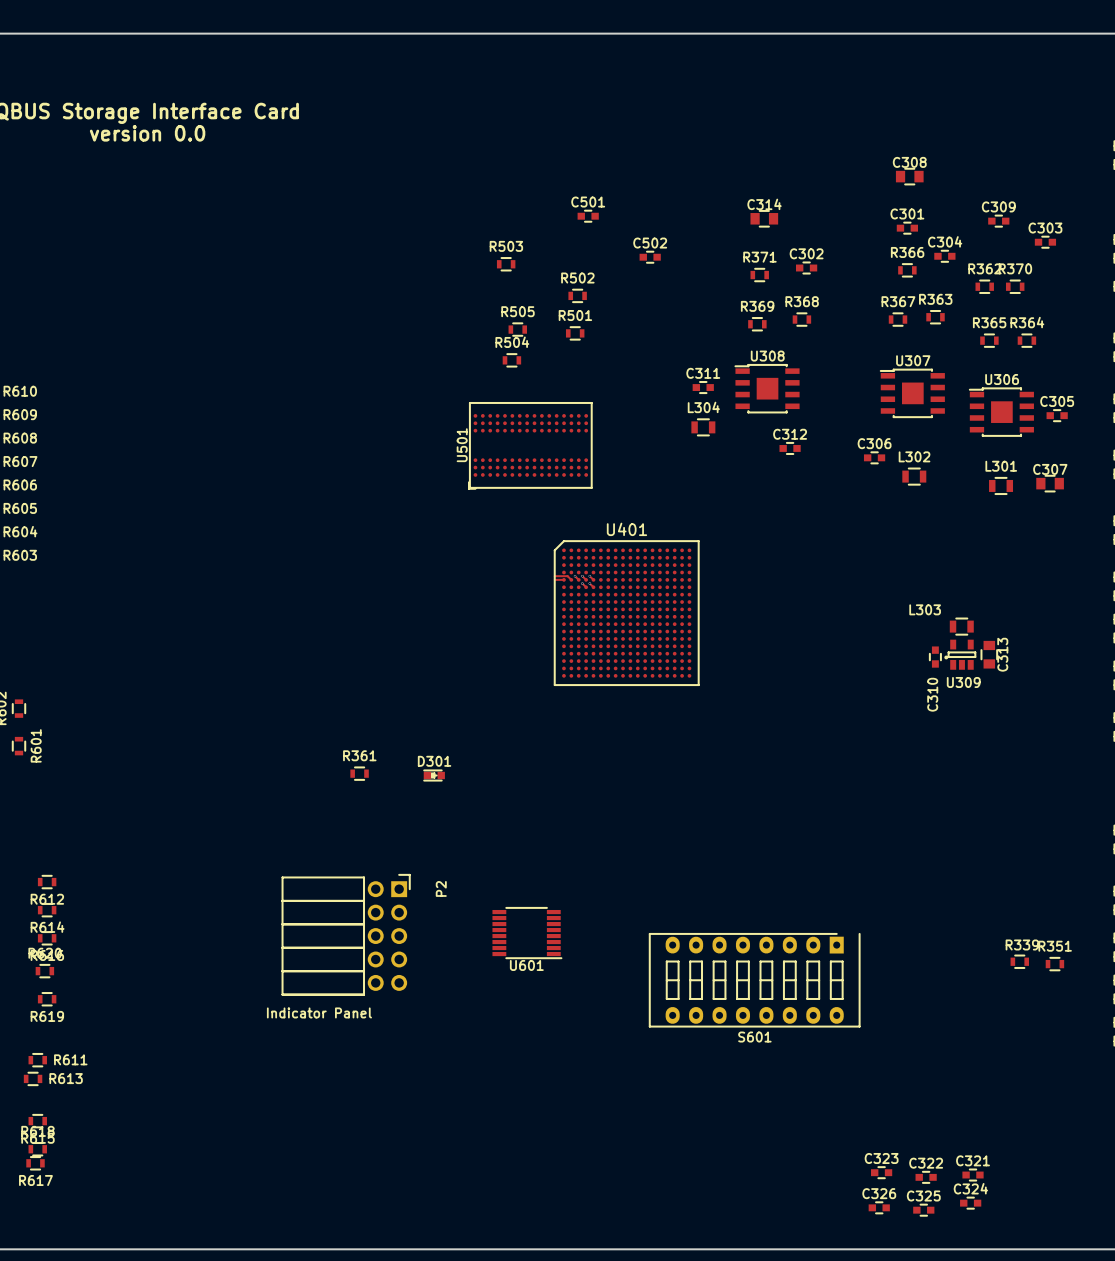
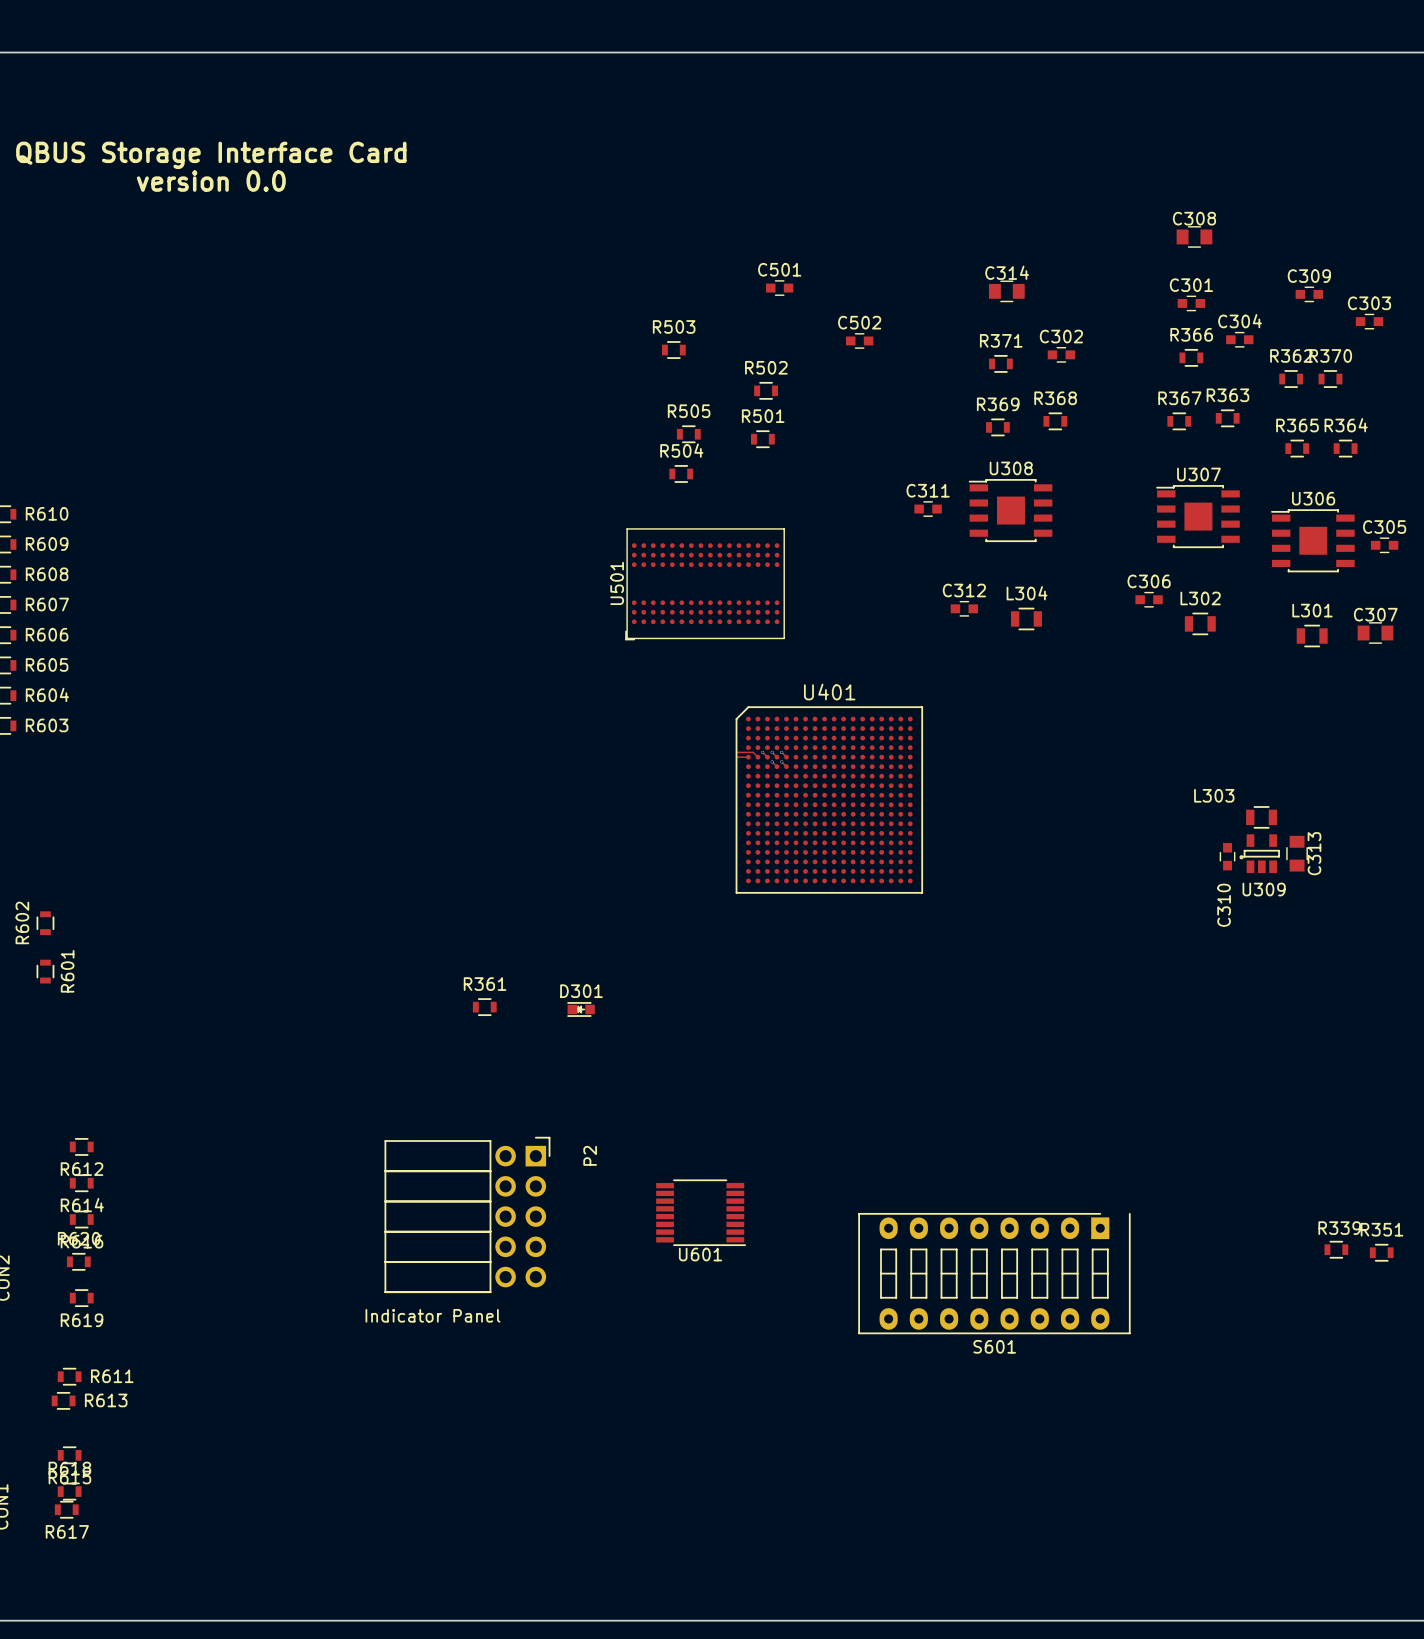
L304 position: (703, 427) -> (1026, 618)
C312 position: (790, 448) -> (964, 608)
C323: (881, 1172) -> none
C321: (973, 1175) -> none
C322: (926, 1177) -> none
C324: (970, 1203) -> none
C326: (879, 1207) -> none
C325: (923, 1210) -> none

